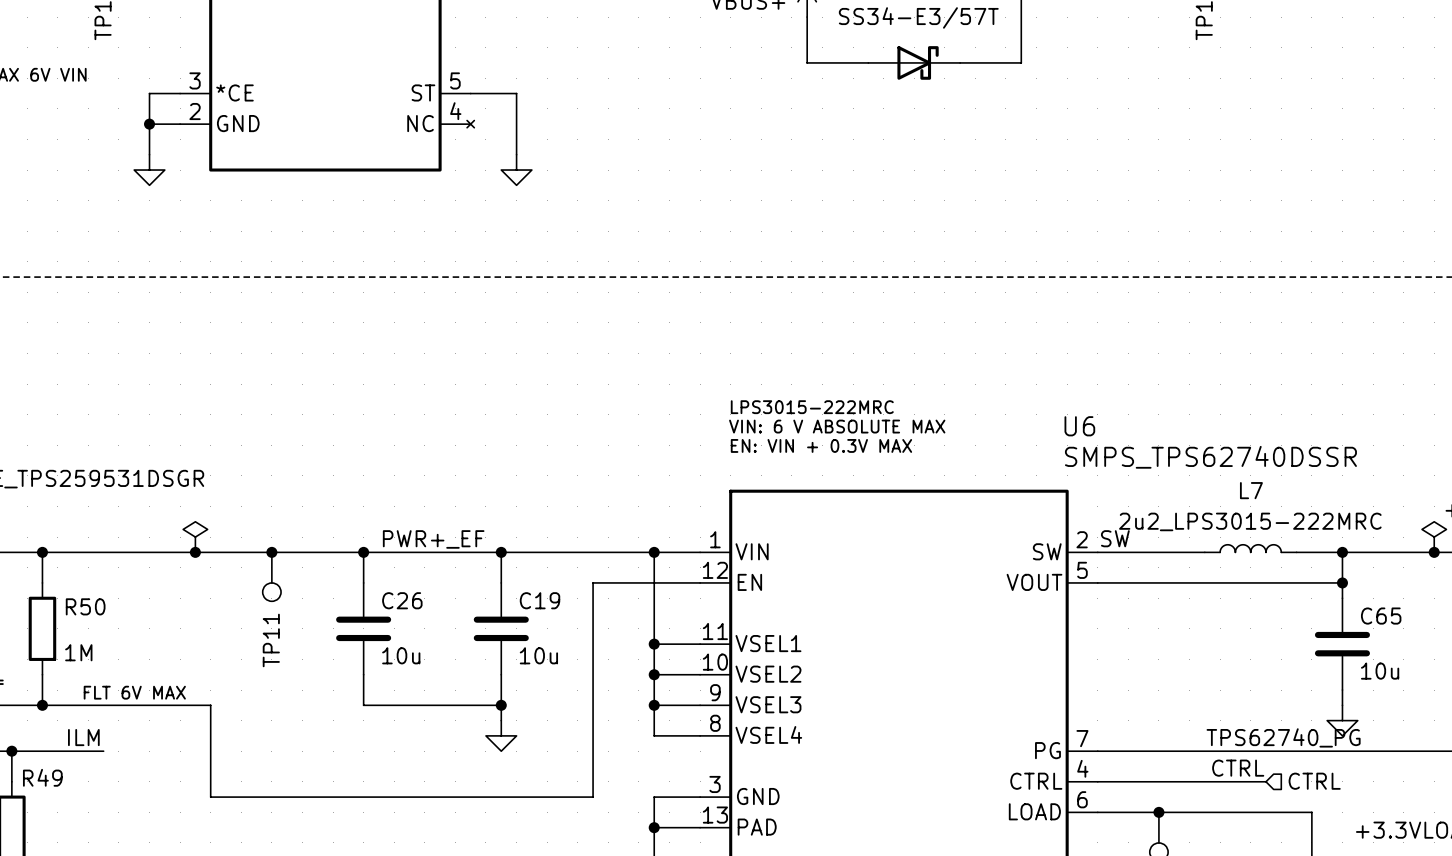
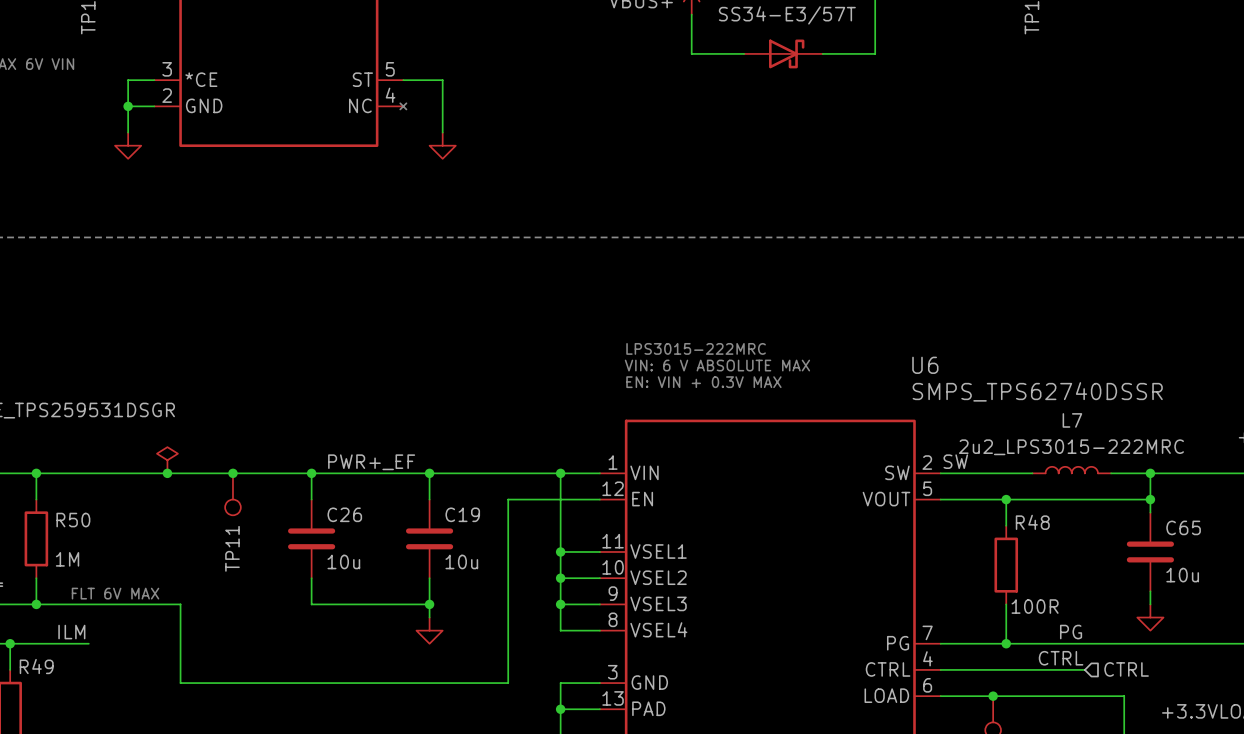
power symbol: (1434, 537) -> none
junction: (1434, 552) -> none
wire: none -> (1006, 499) (1006, 525)
junction: none -> (1006, 499)
R48: none -> 100R (1006, 565)
wire: none -> (1006, 604) (1006, 643)
label: none -> PG (1071, 632)
label: TPS62740_PG (1283, 737) -> none
junction: none -> (1006, 643)

